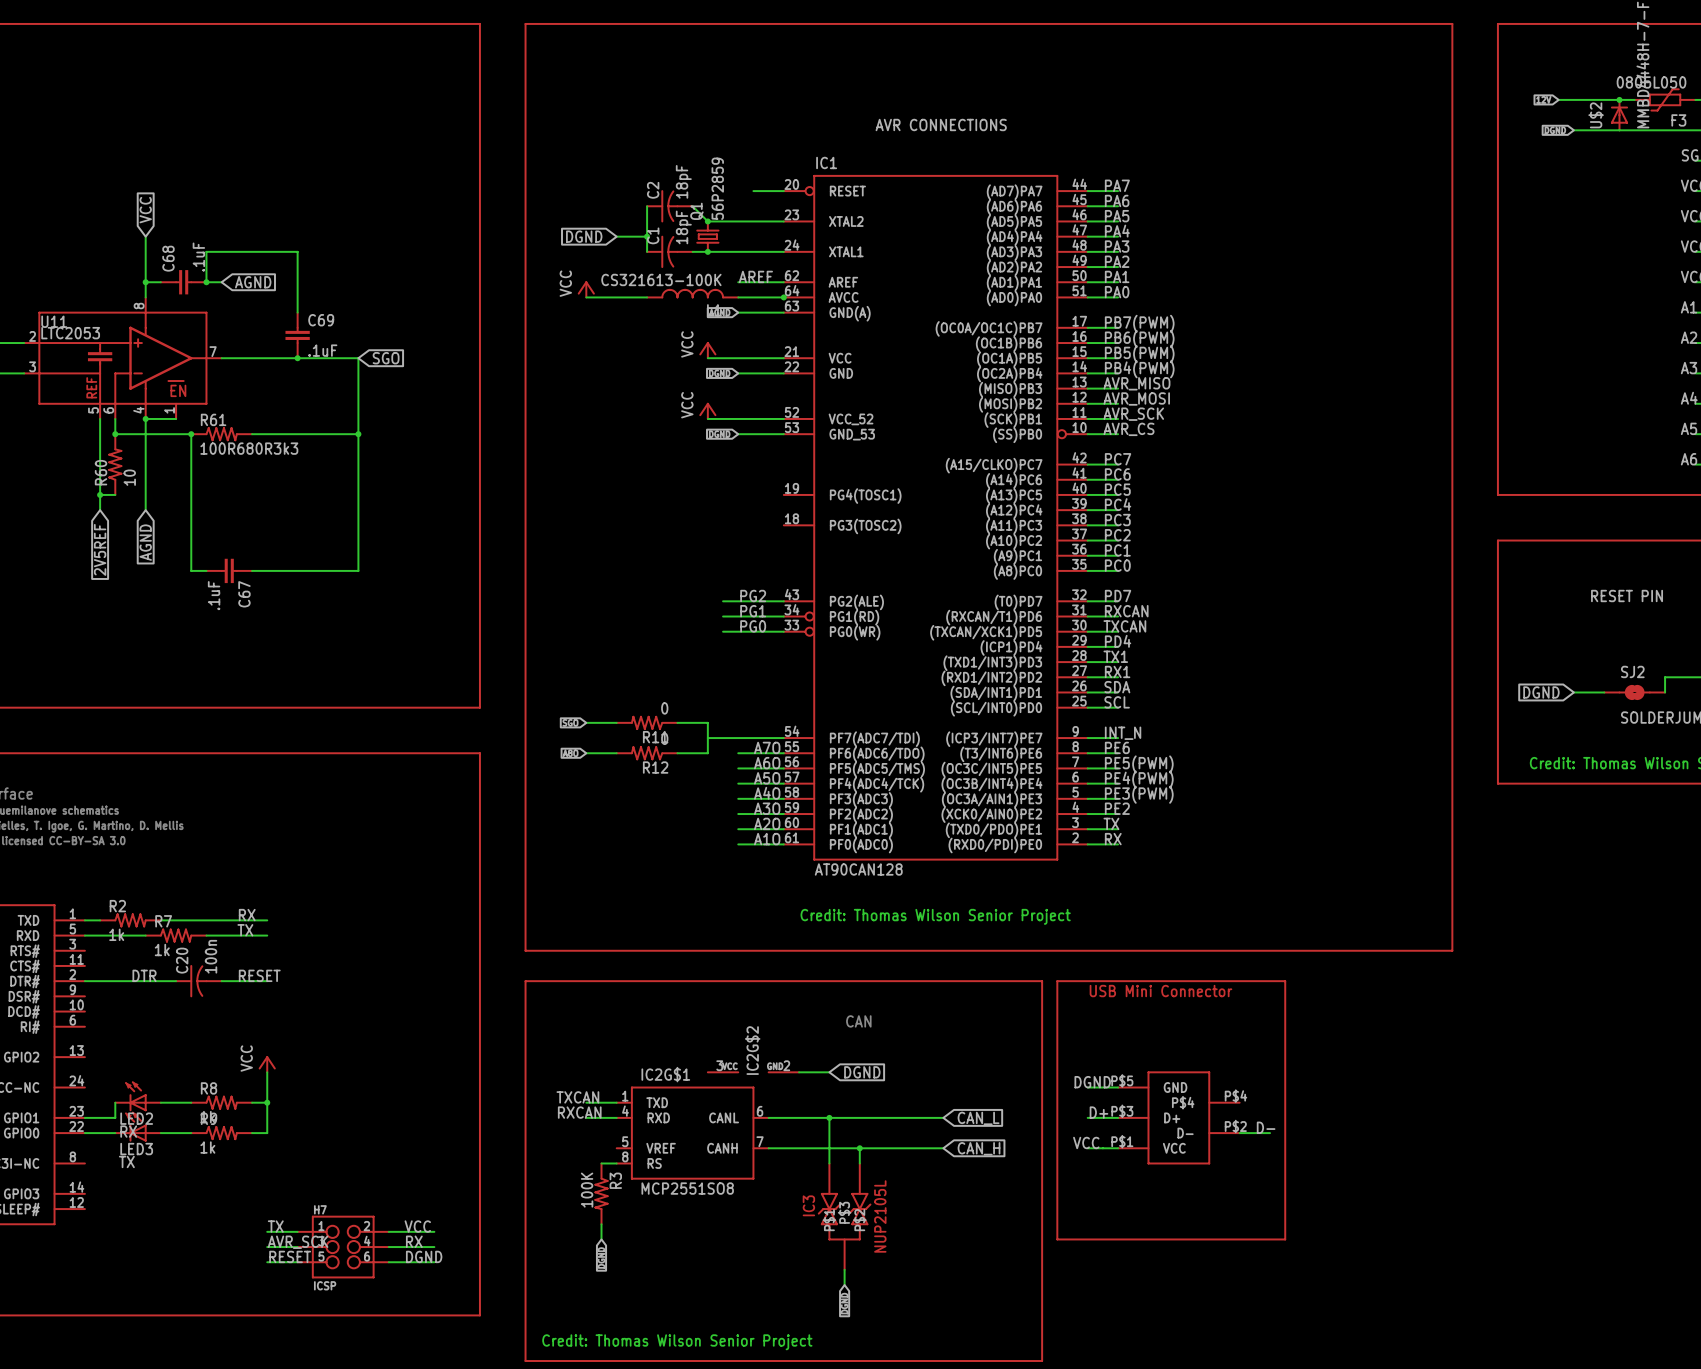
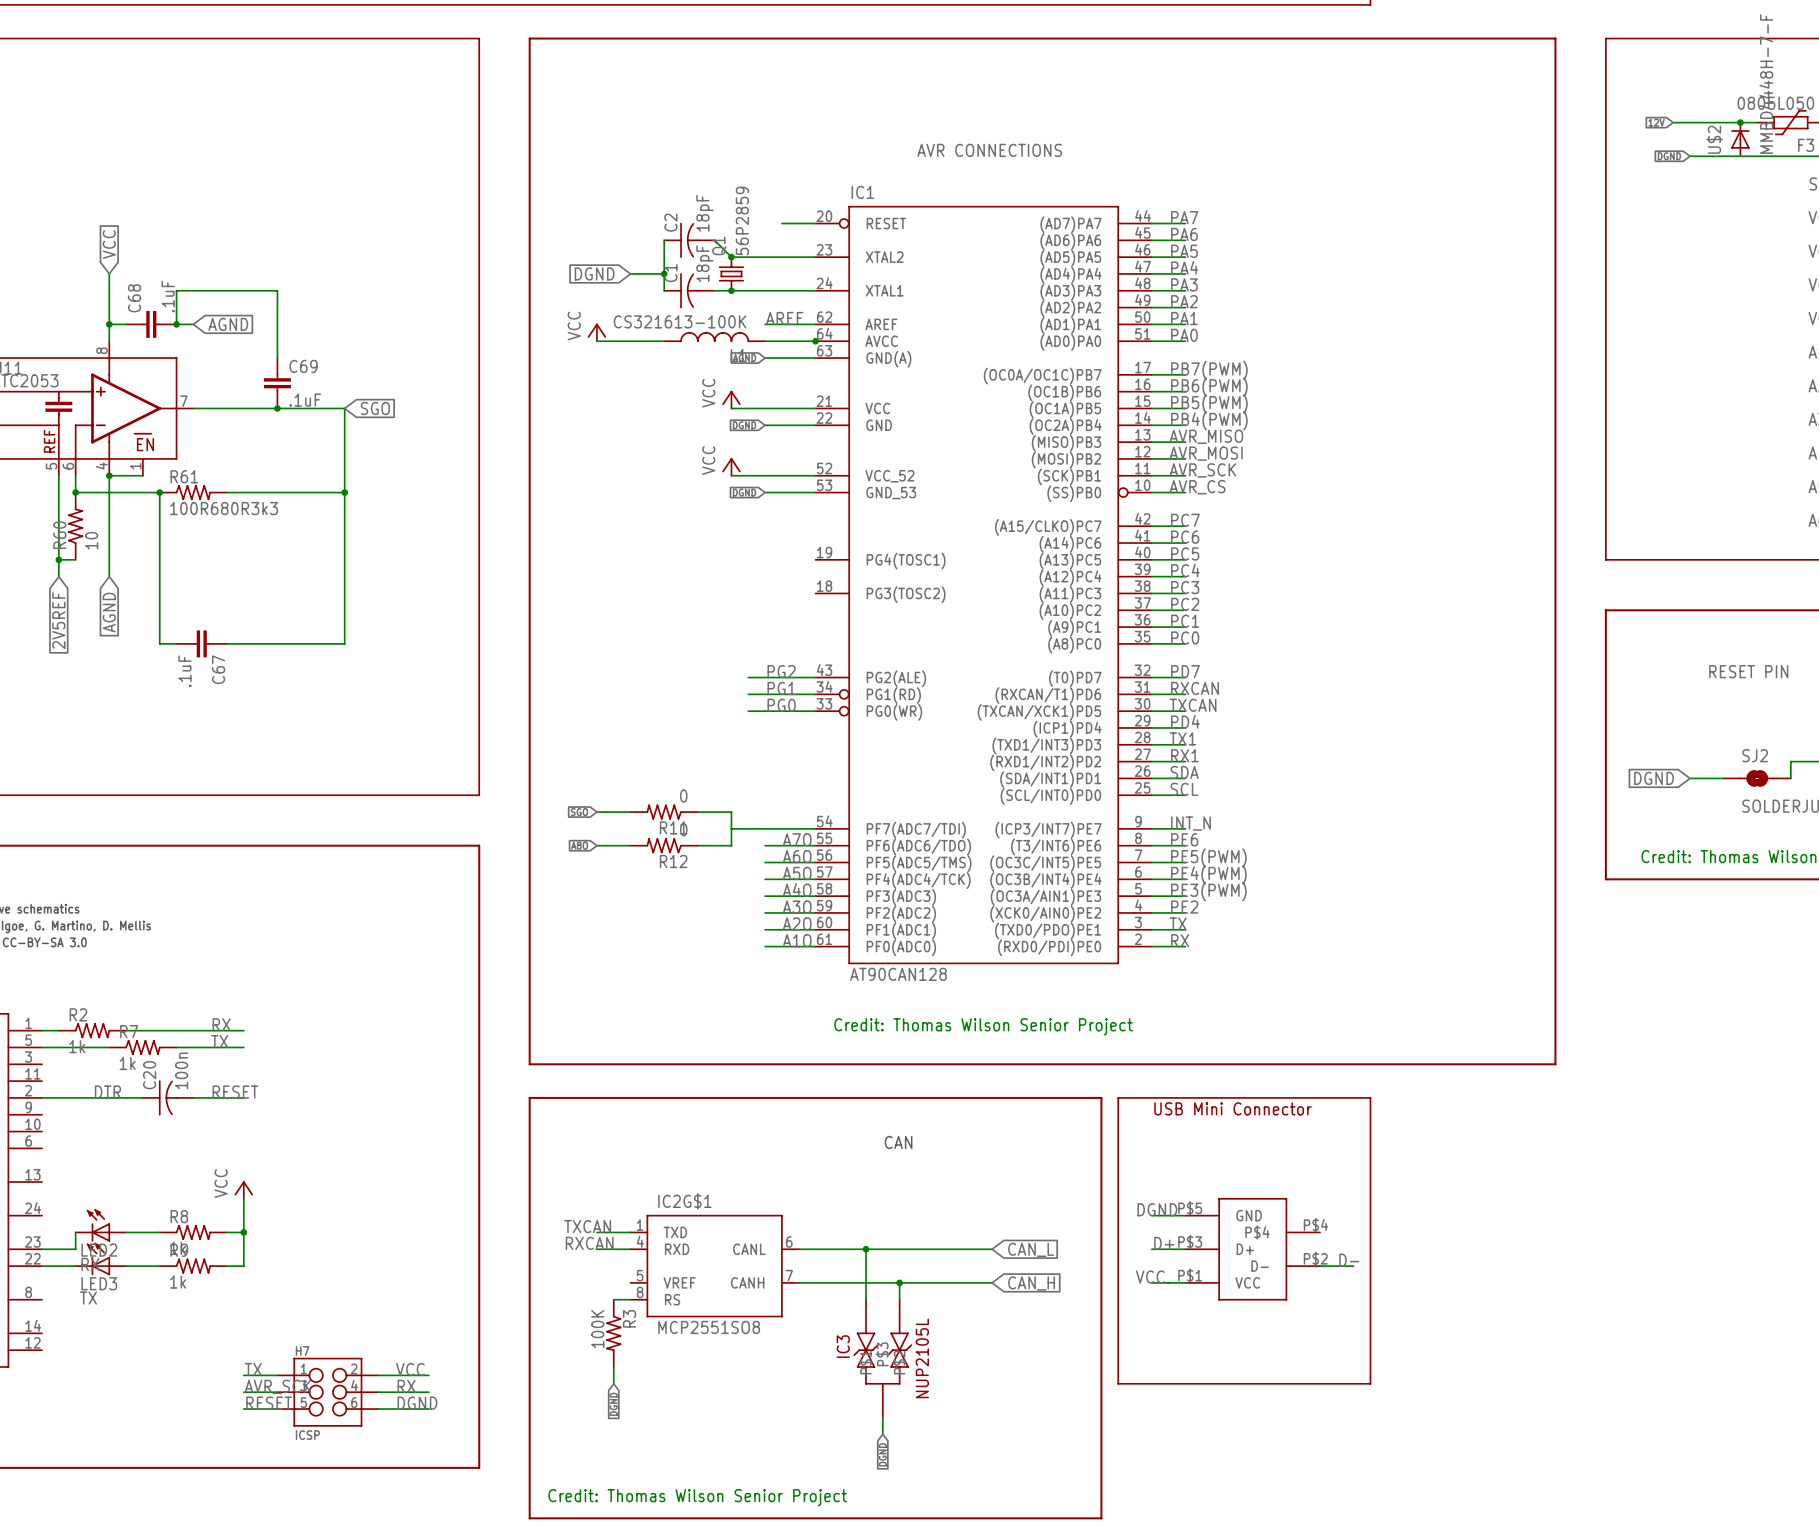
IC2G$2: (753, 1072) -> none
wire: (799, 1072) (829, 1072) -> none
global label: DGND (862, 1072) -> none

